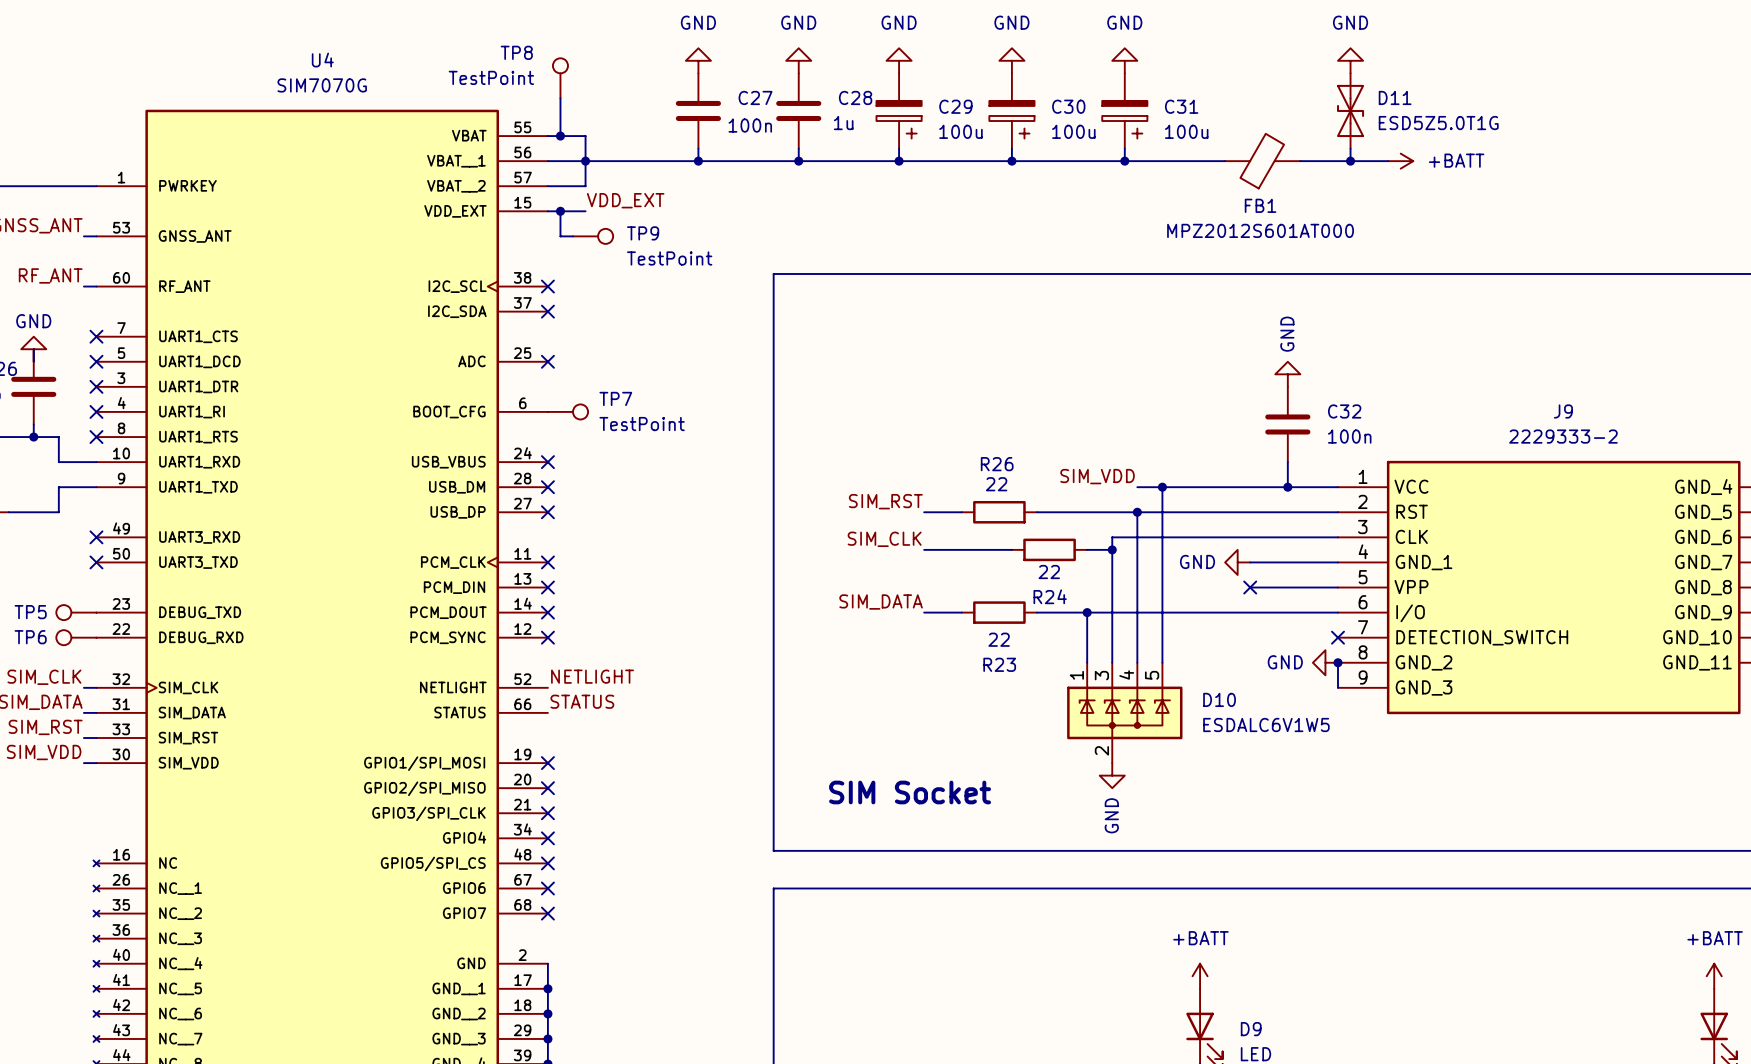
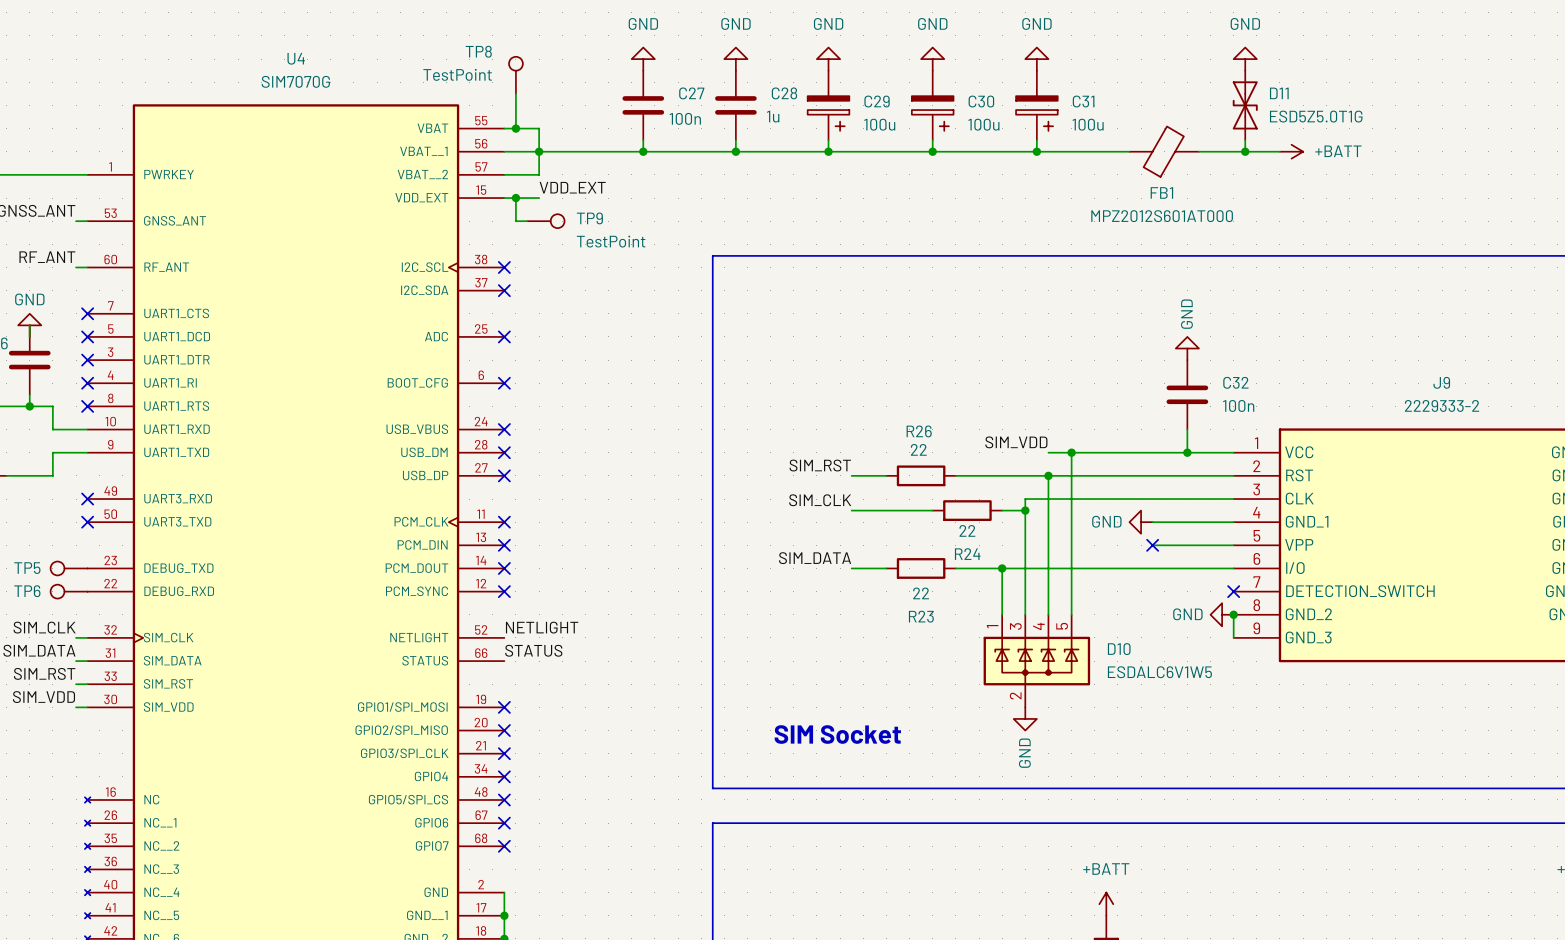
no-connect mark: none -> (504, 383)
TP7: TestPoint (567, 411) -> none

